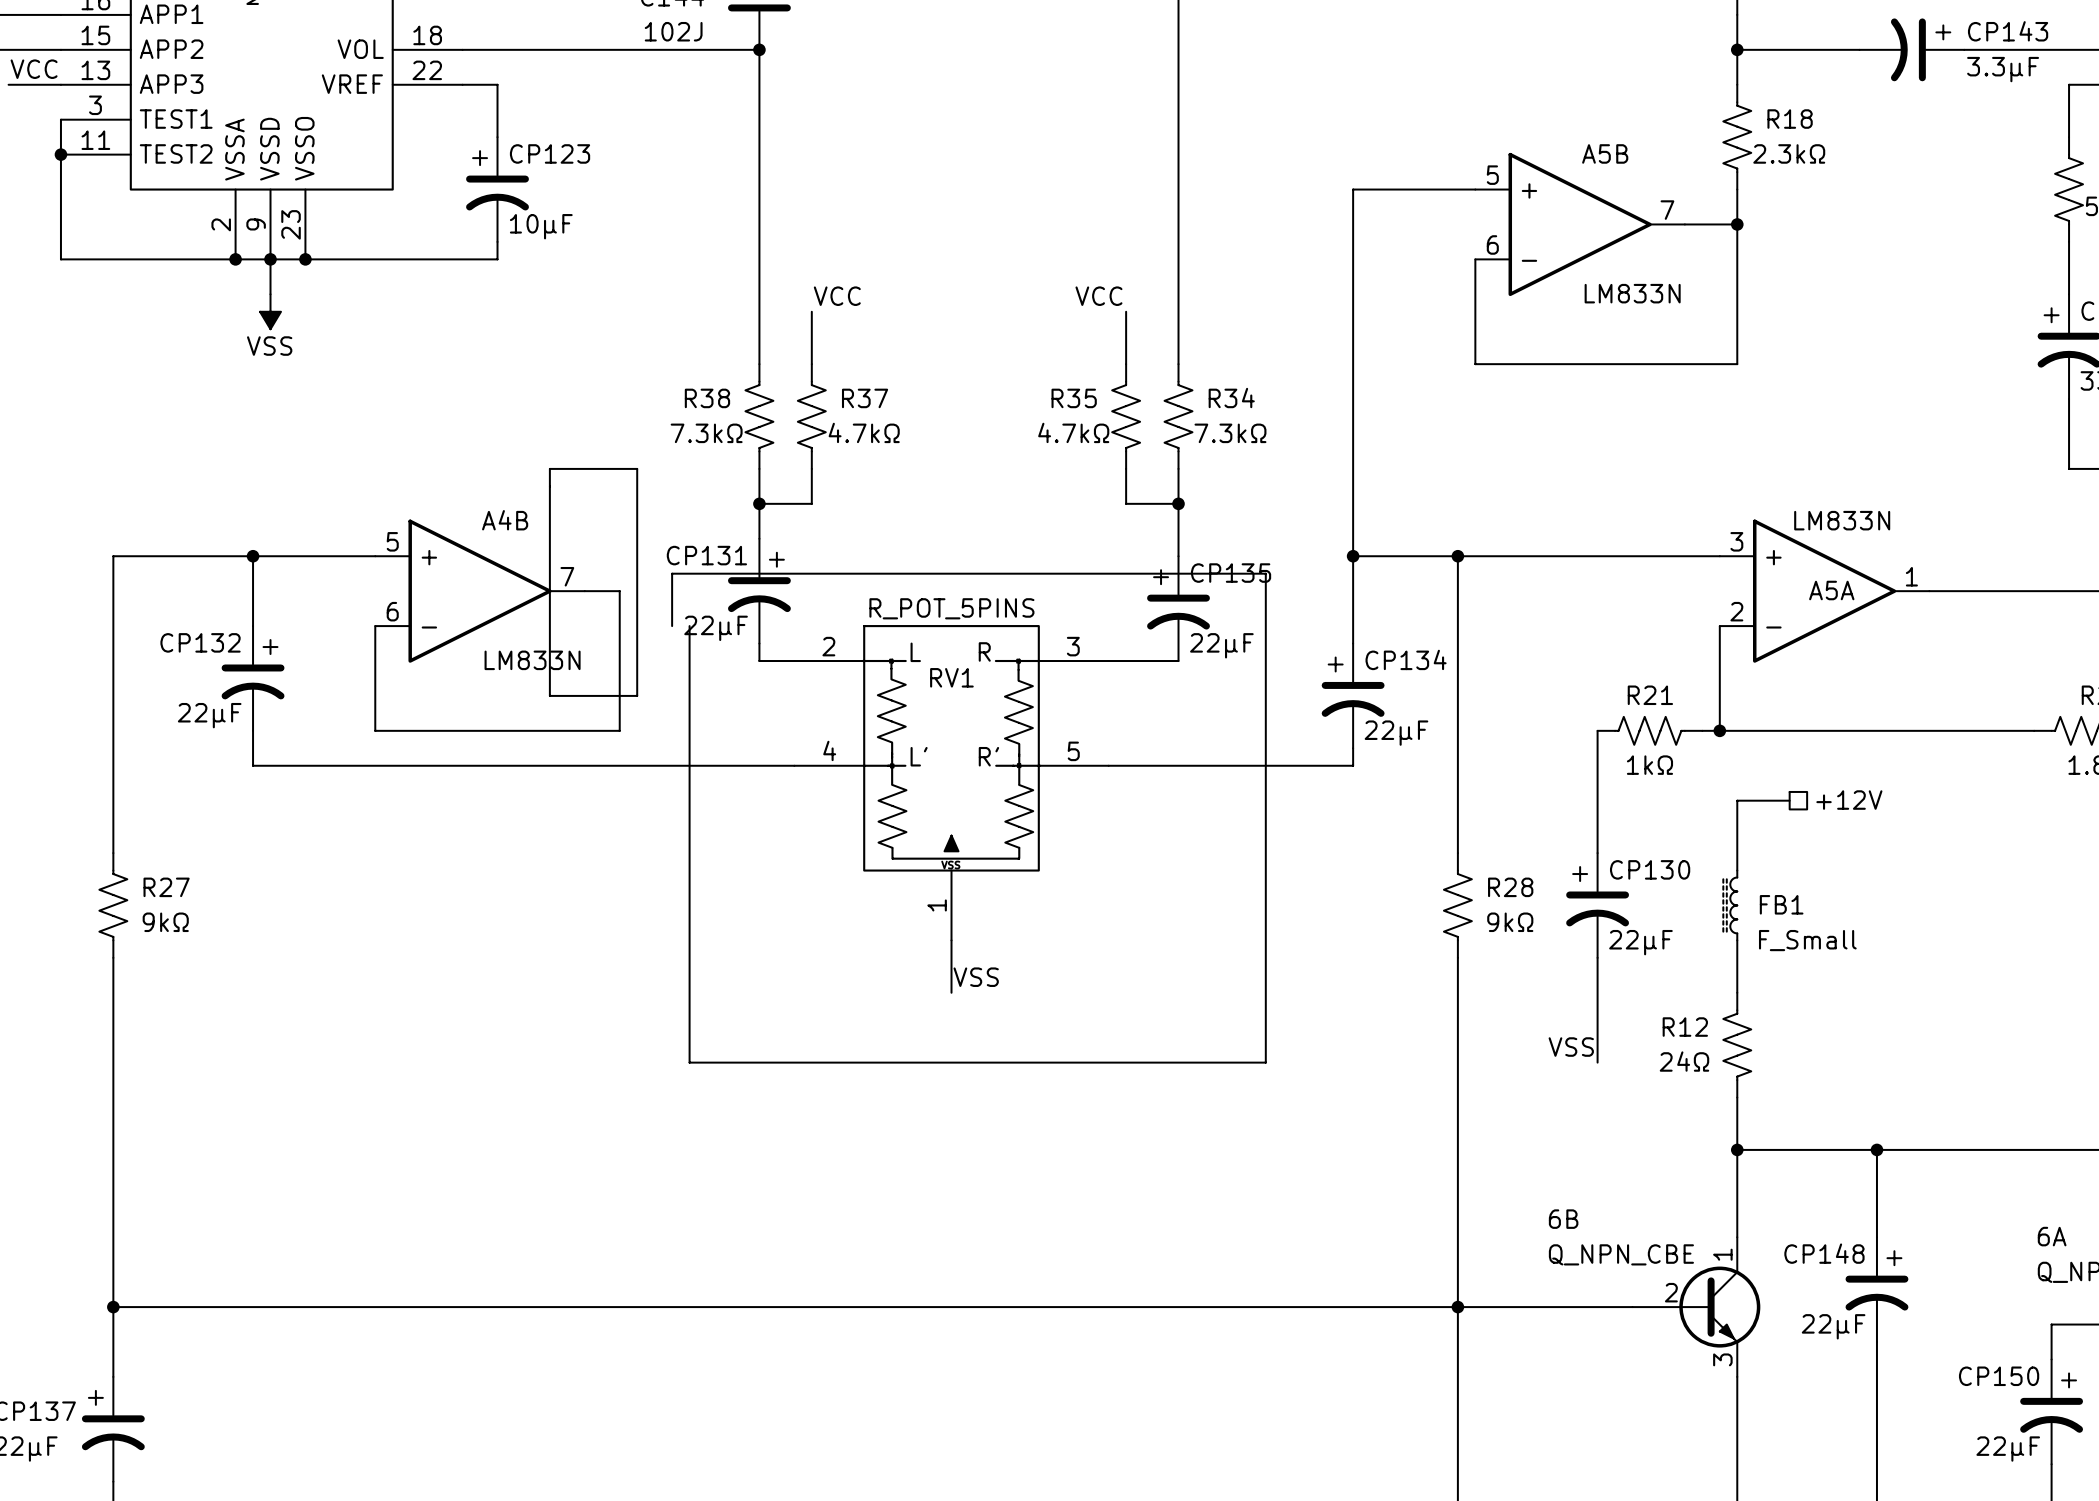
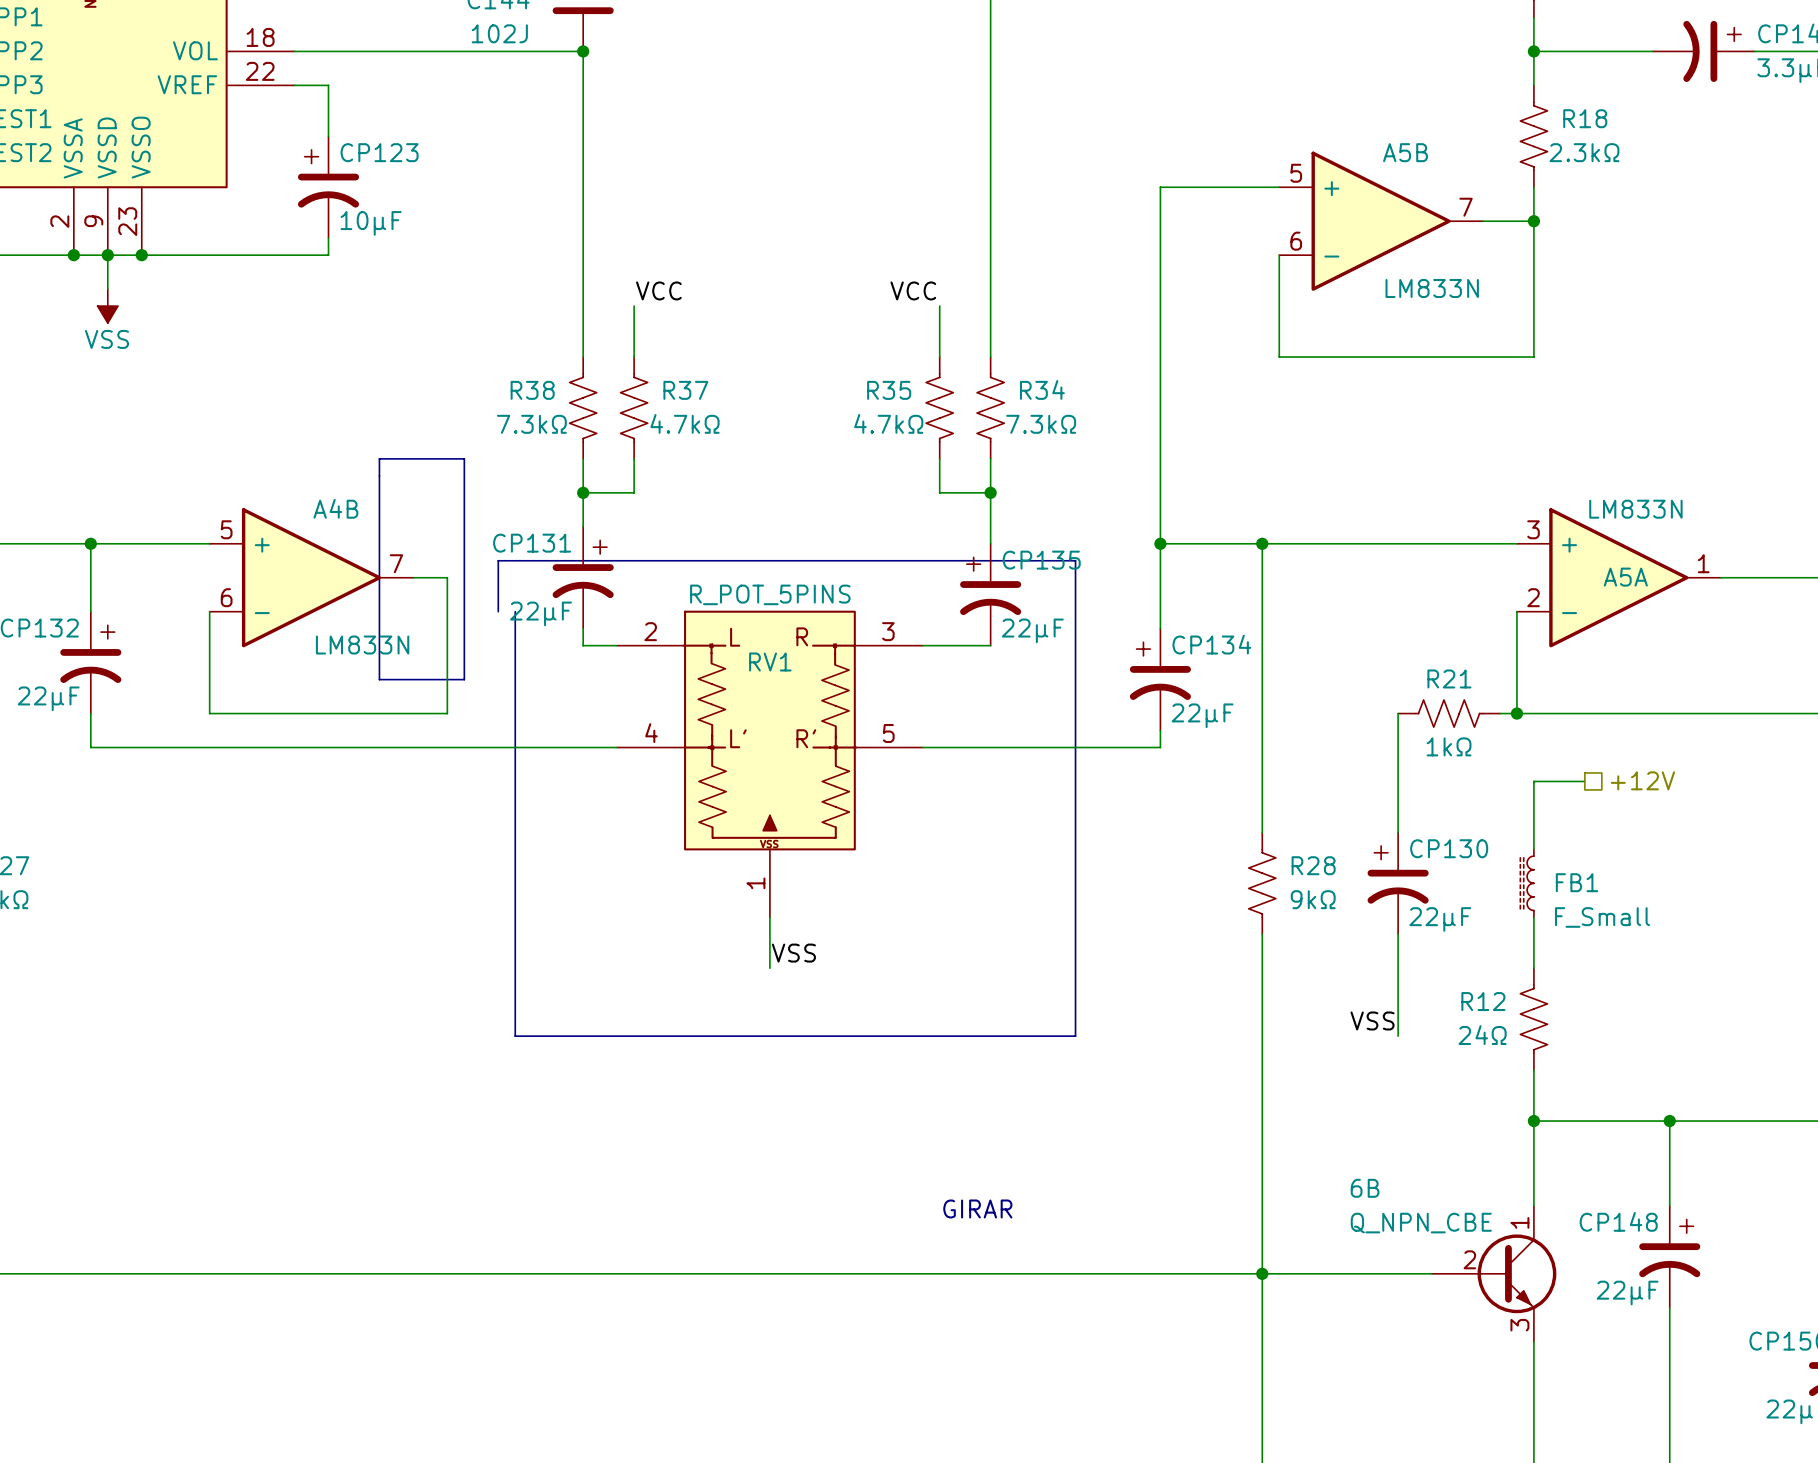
text: none -> GIRAR (977, 1208)

